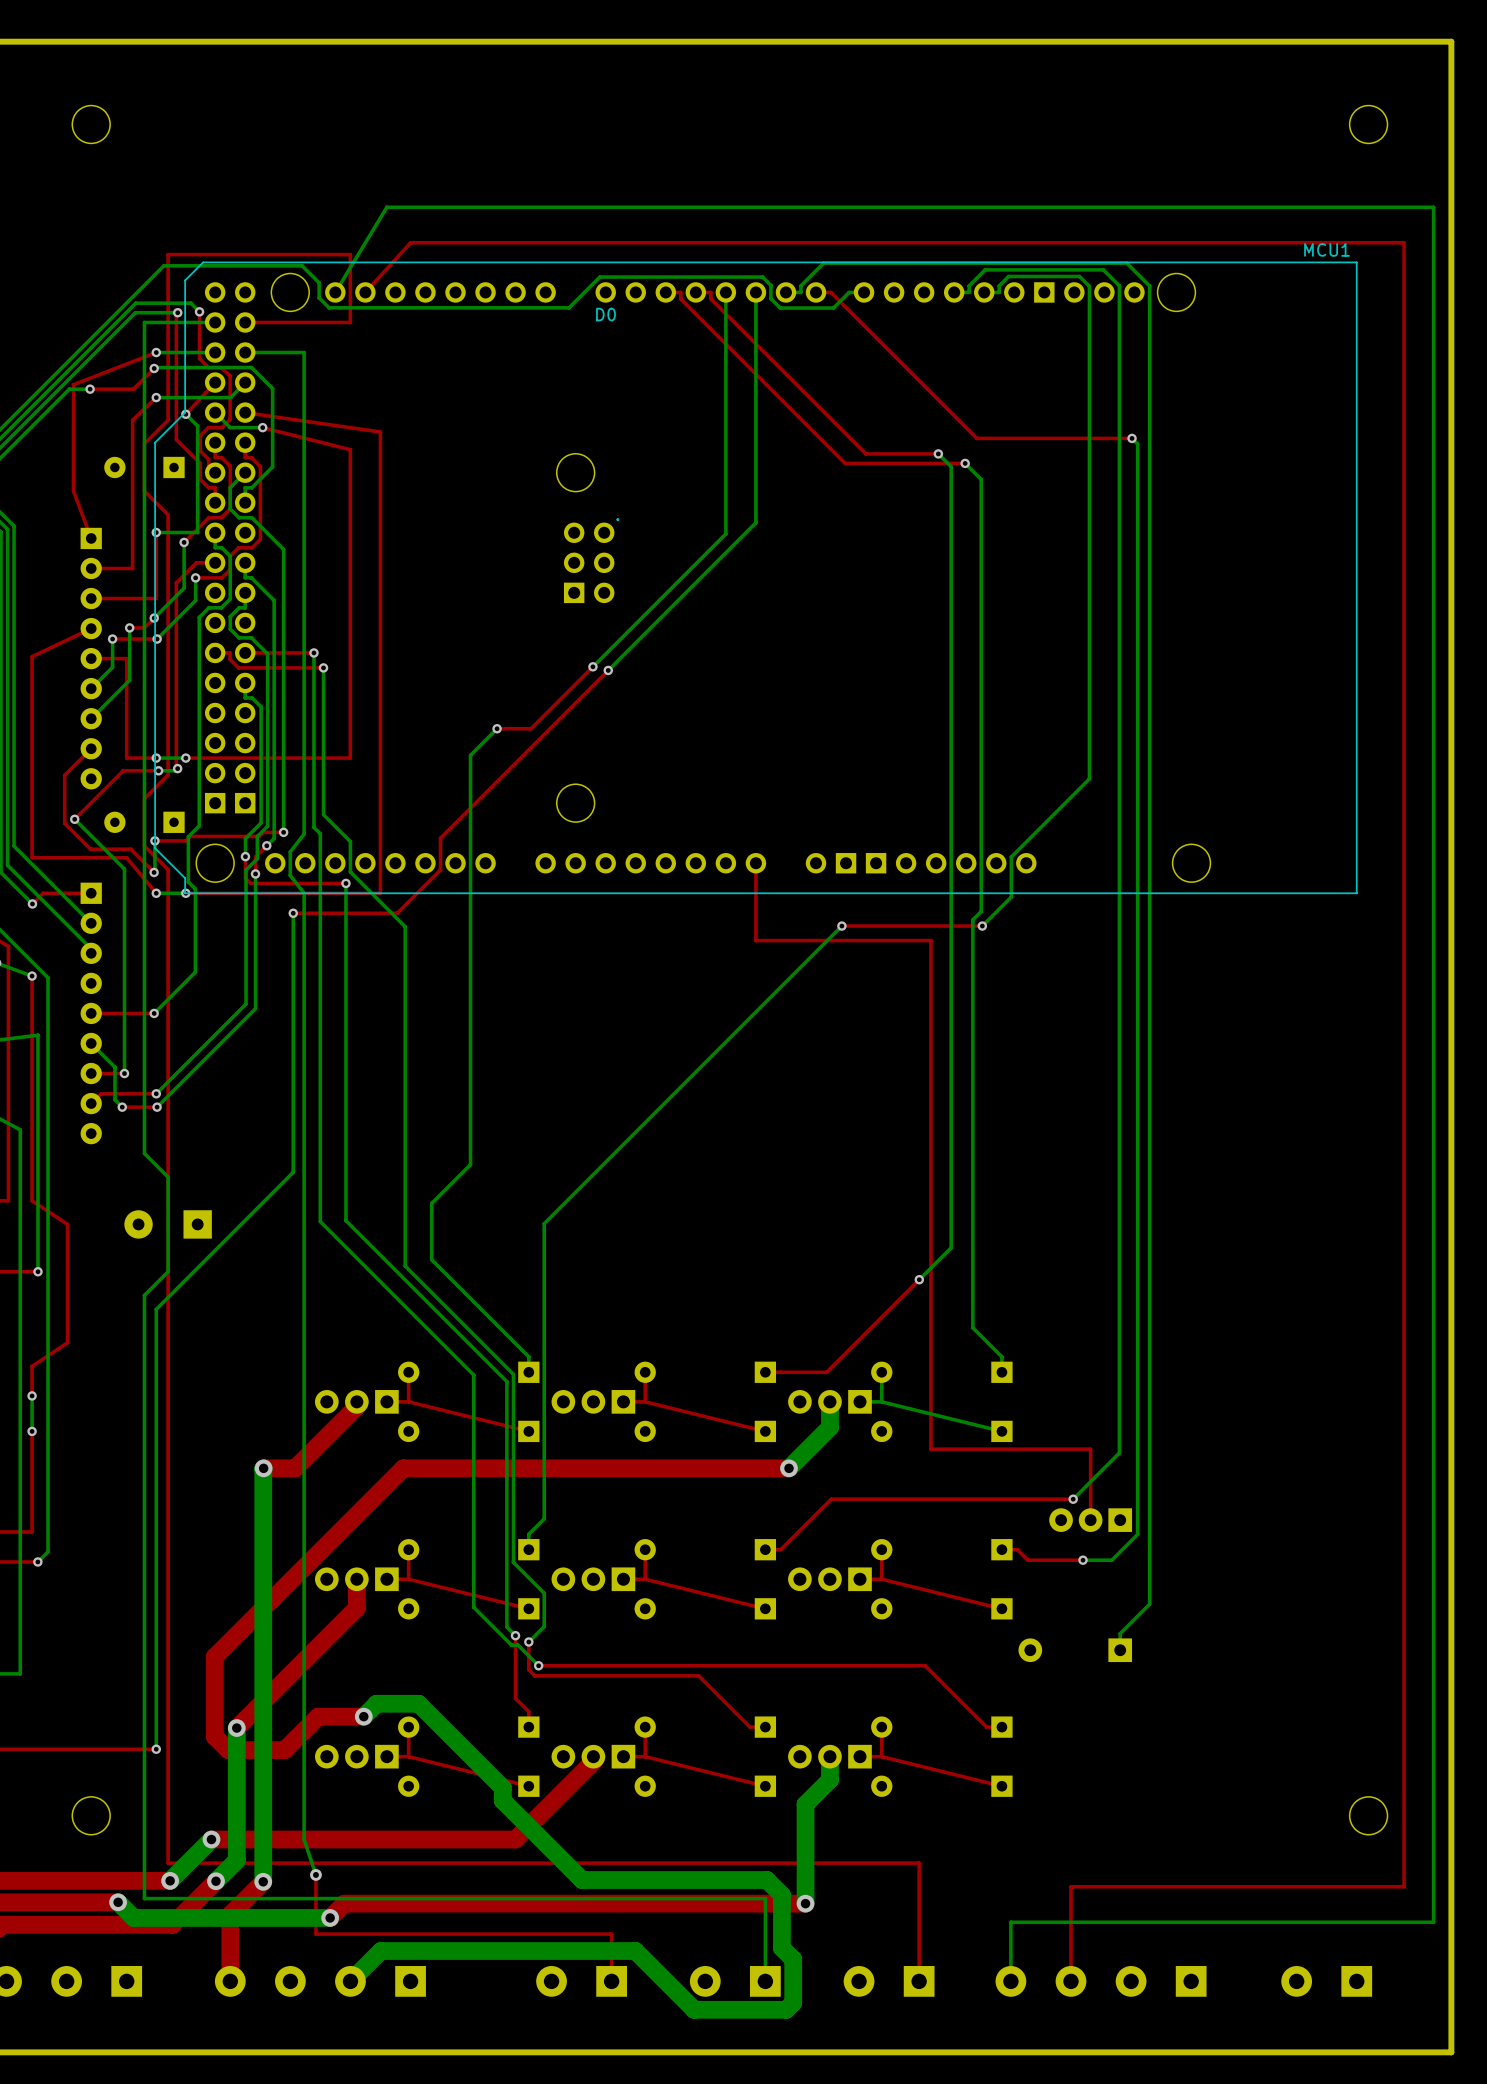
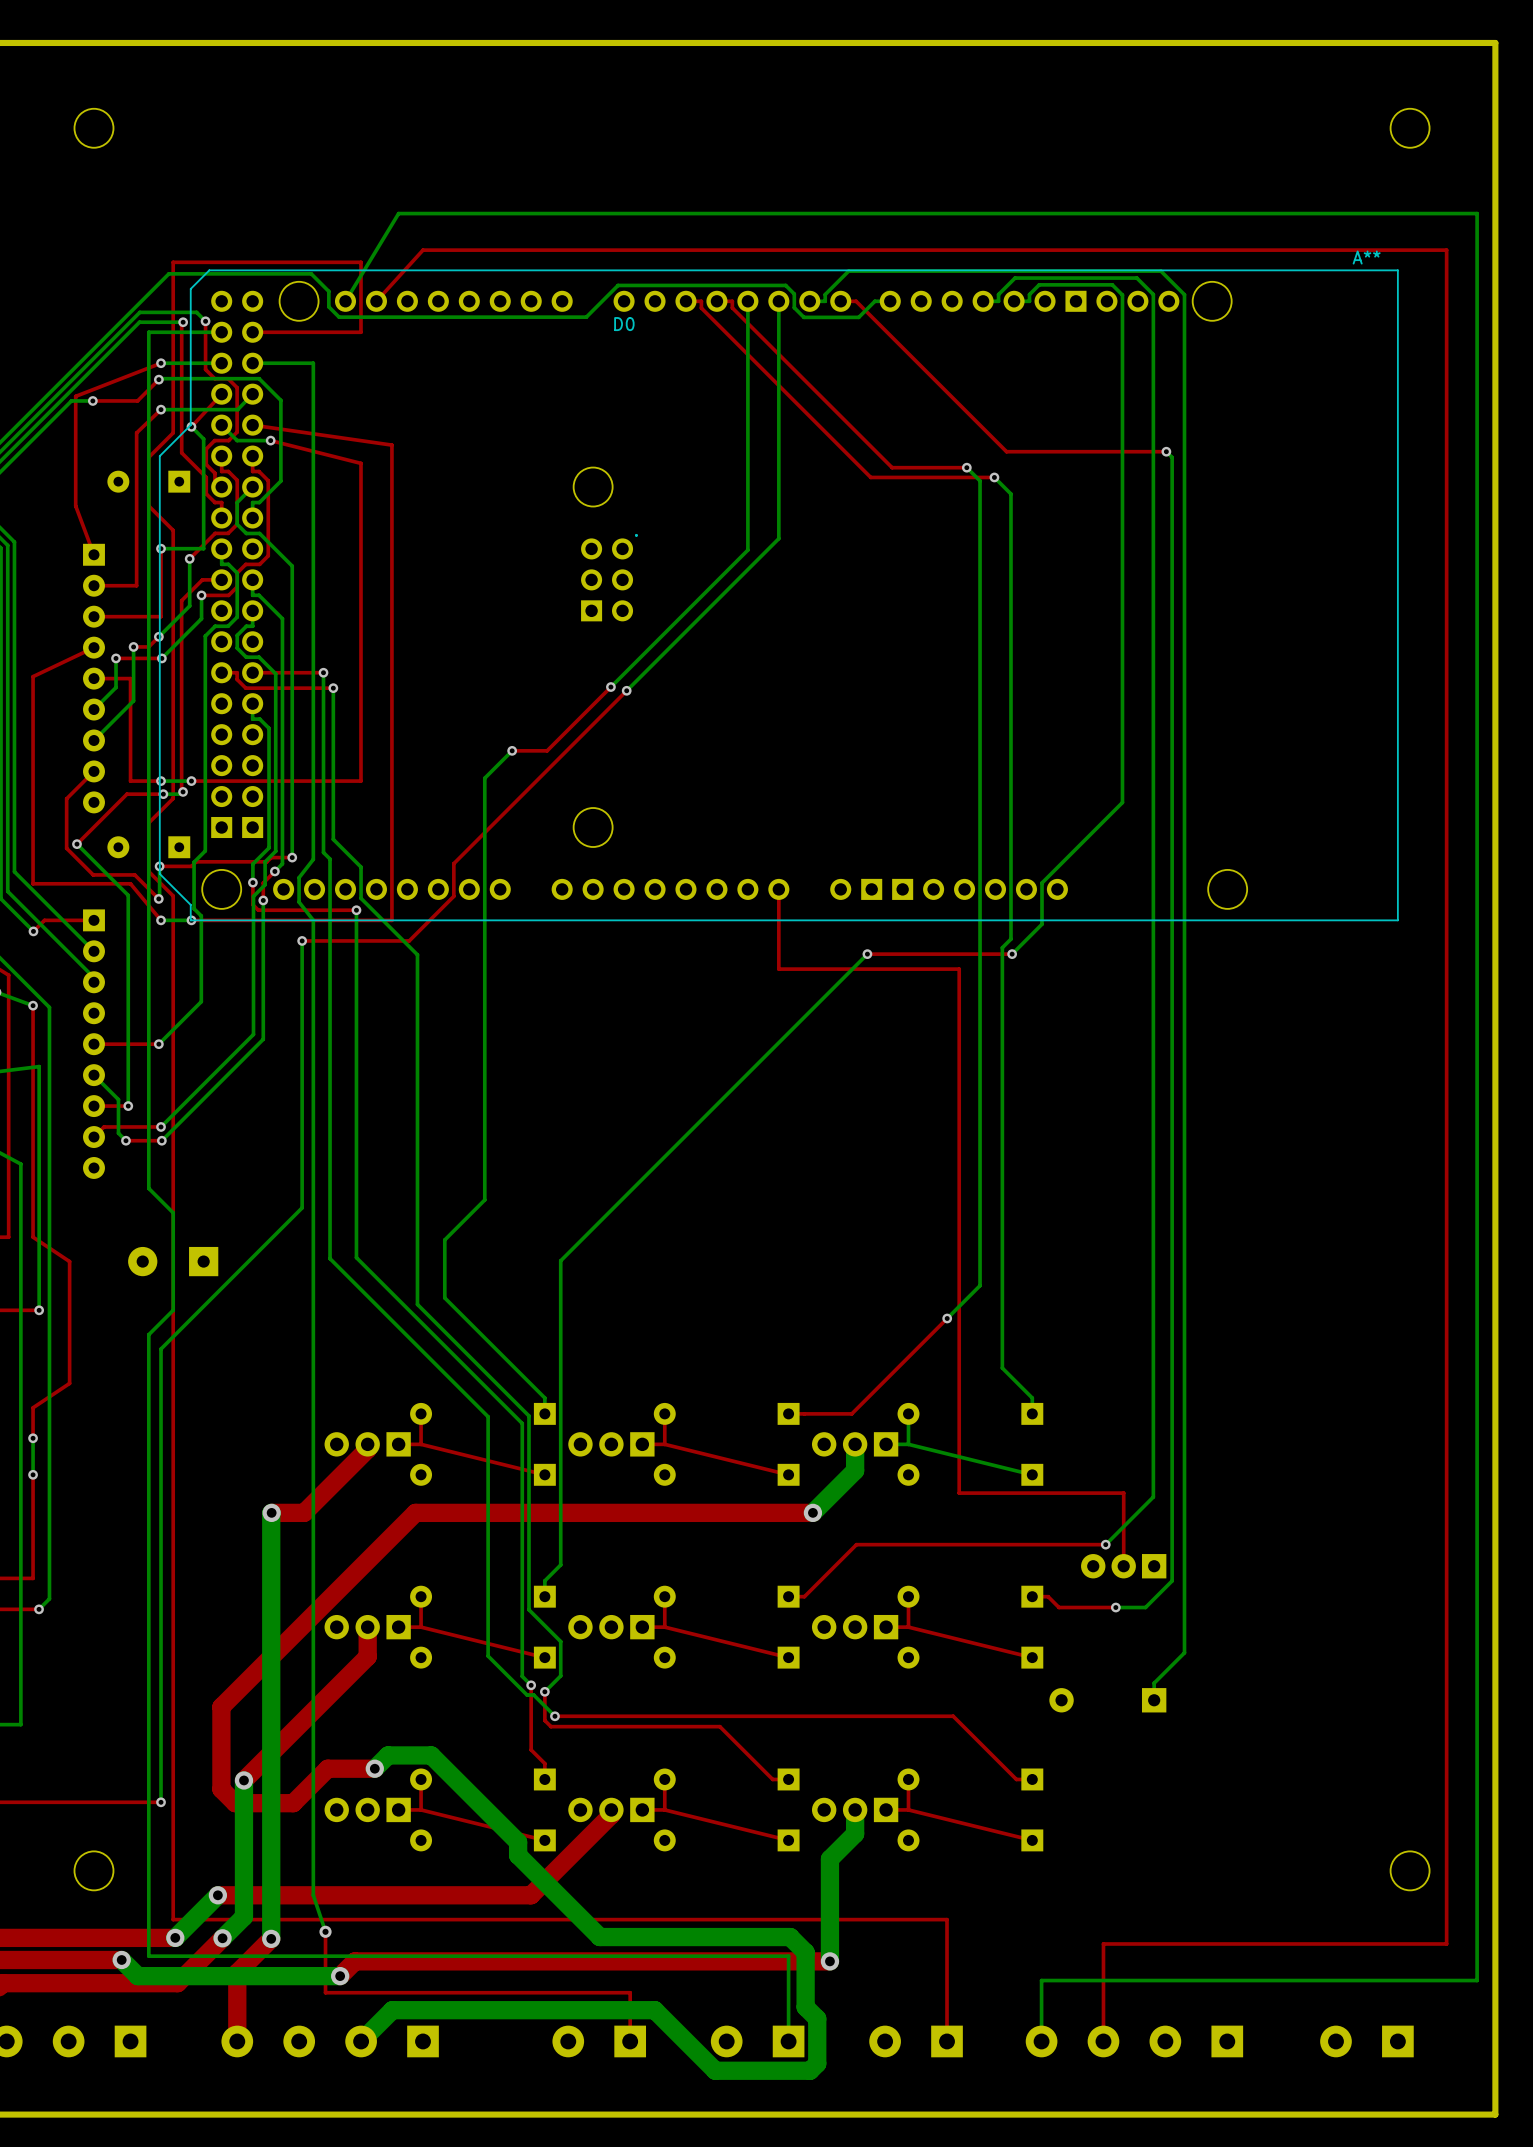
MCU1 name: MCU1 (1326, 249) -> A** (1366, 257)

